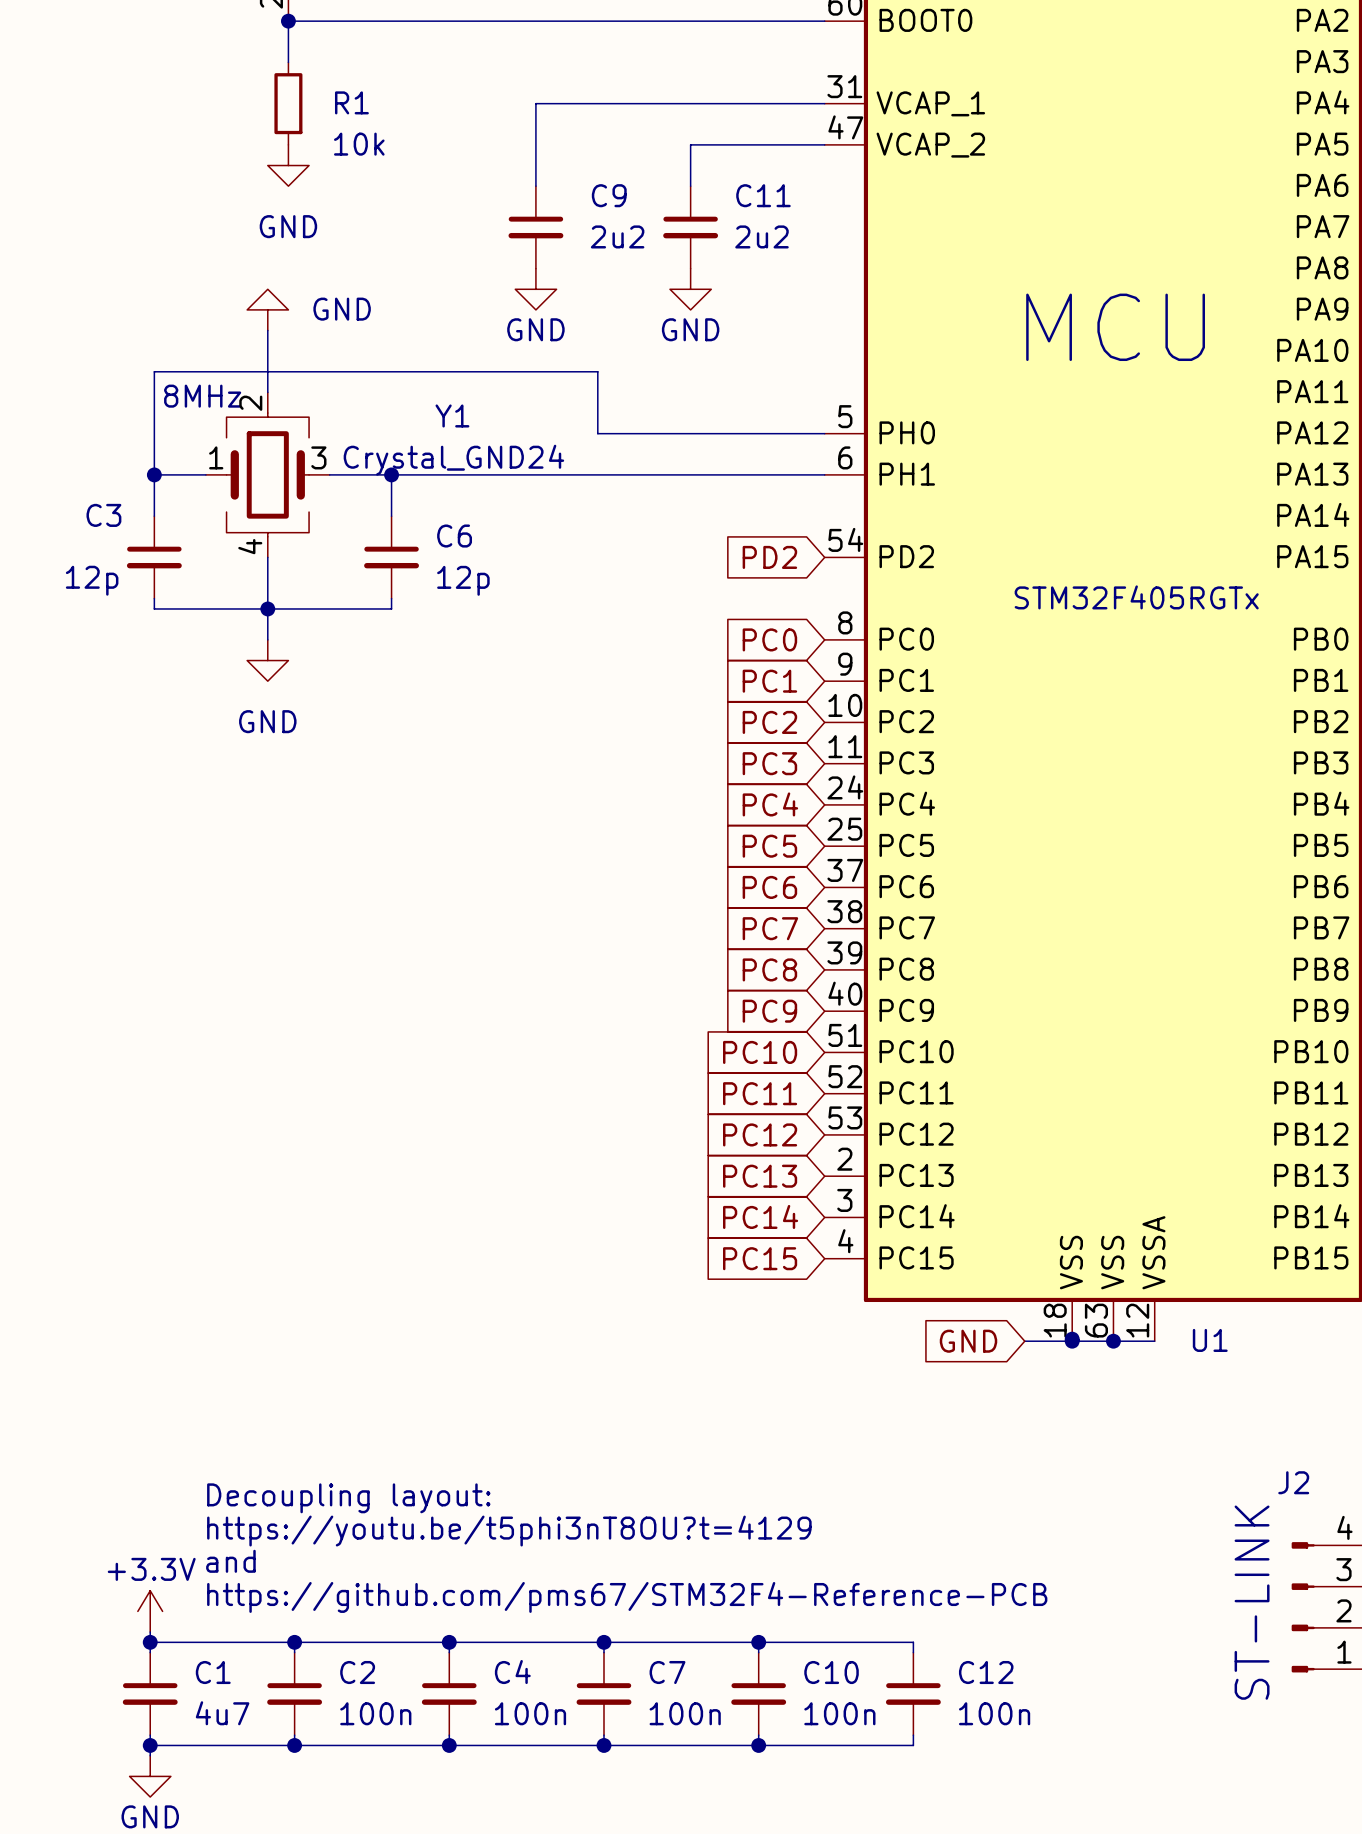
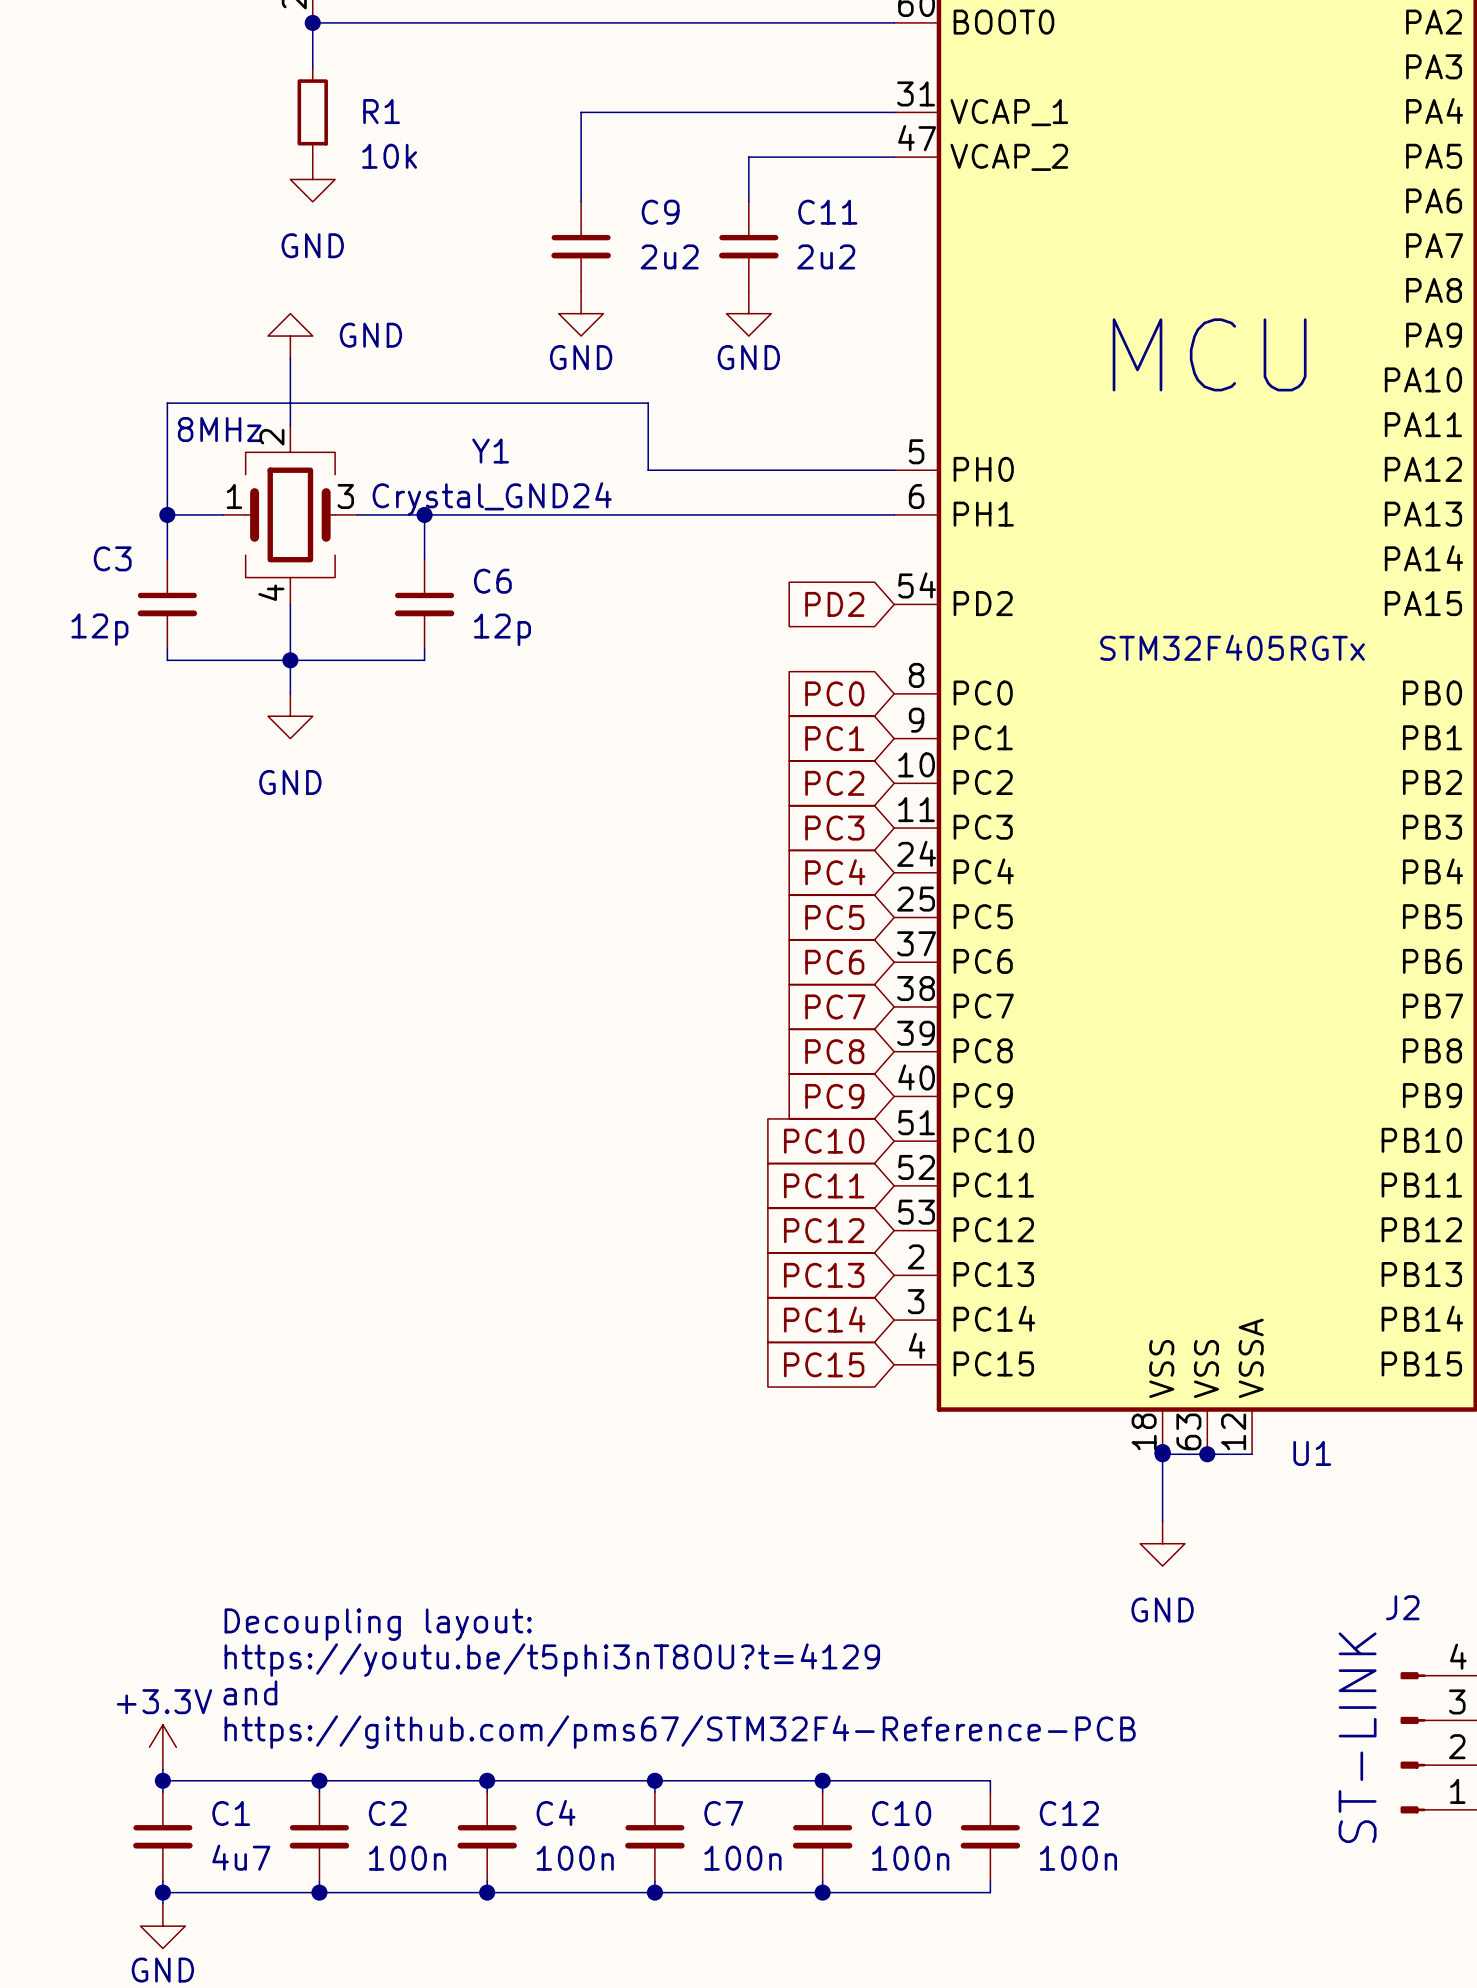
wire: (1072, 1339) (1072, 1341) (1024, 1341) -> none
global label: GND (968, 1341) -> none
wire: none -> (1162, 1454) (1162, 1521)
power symbol: none -> GND (1162, 1543)

